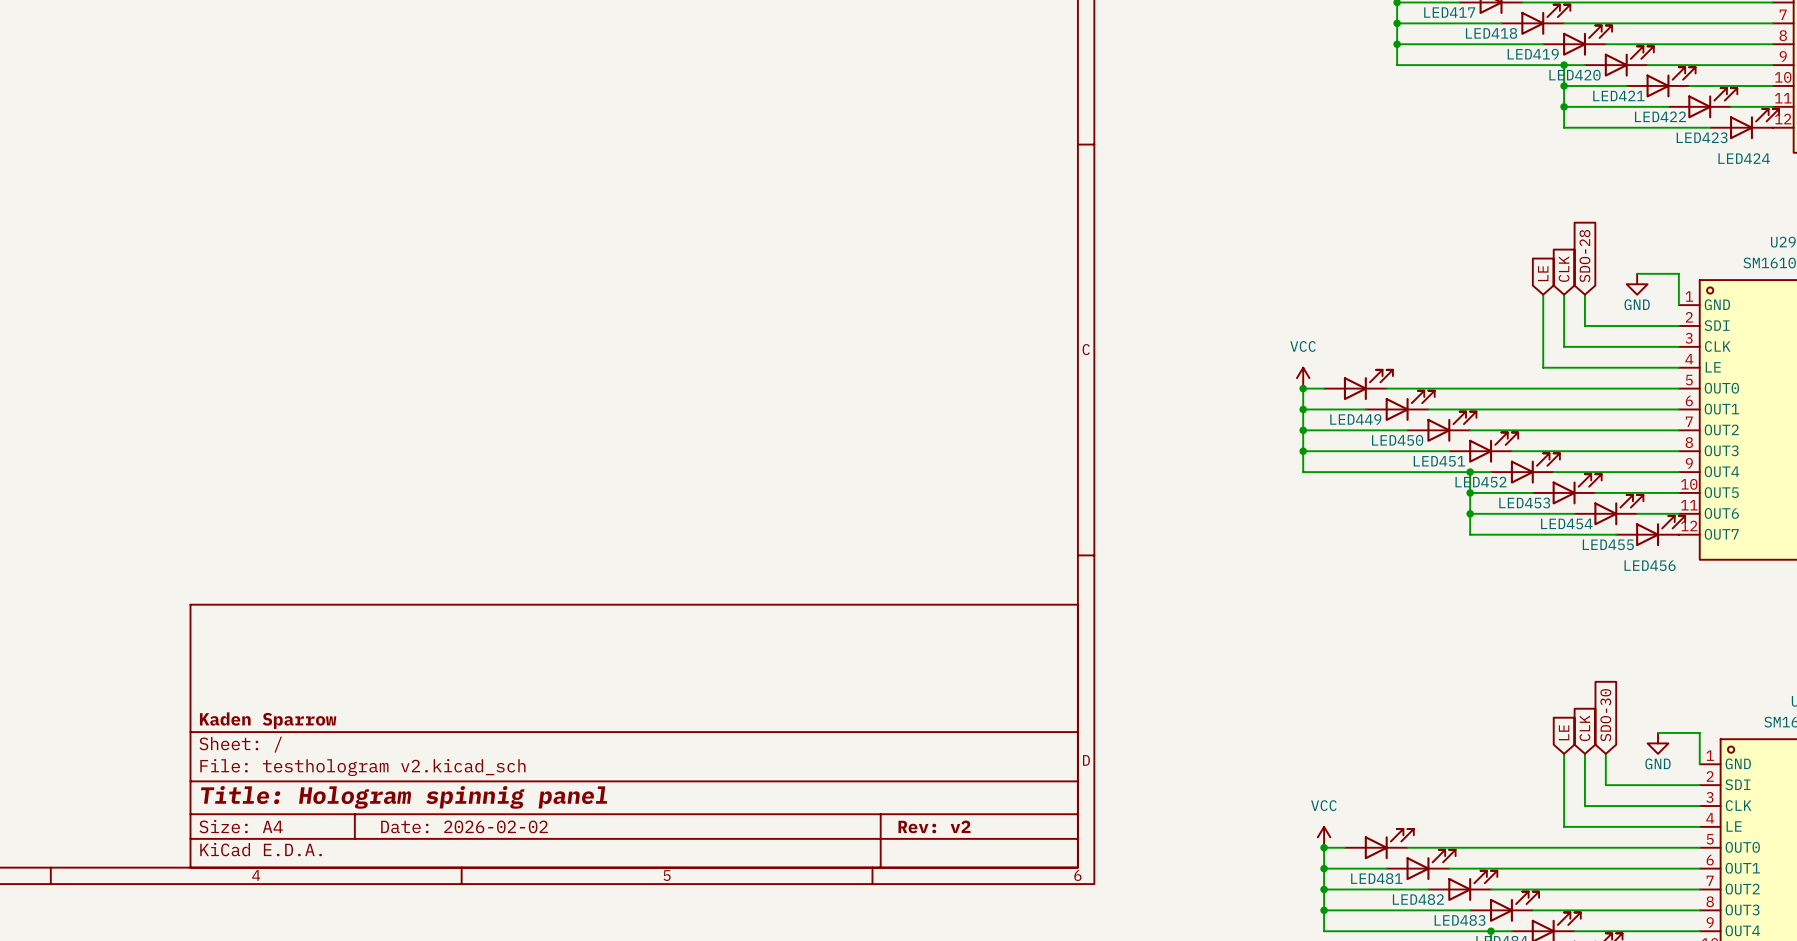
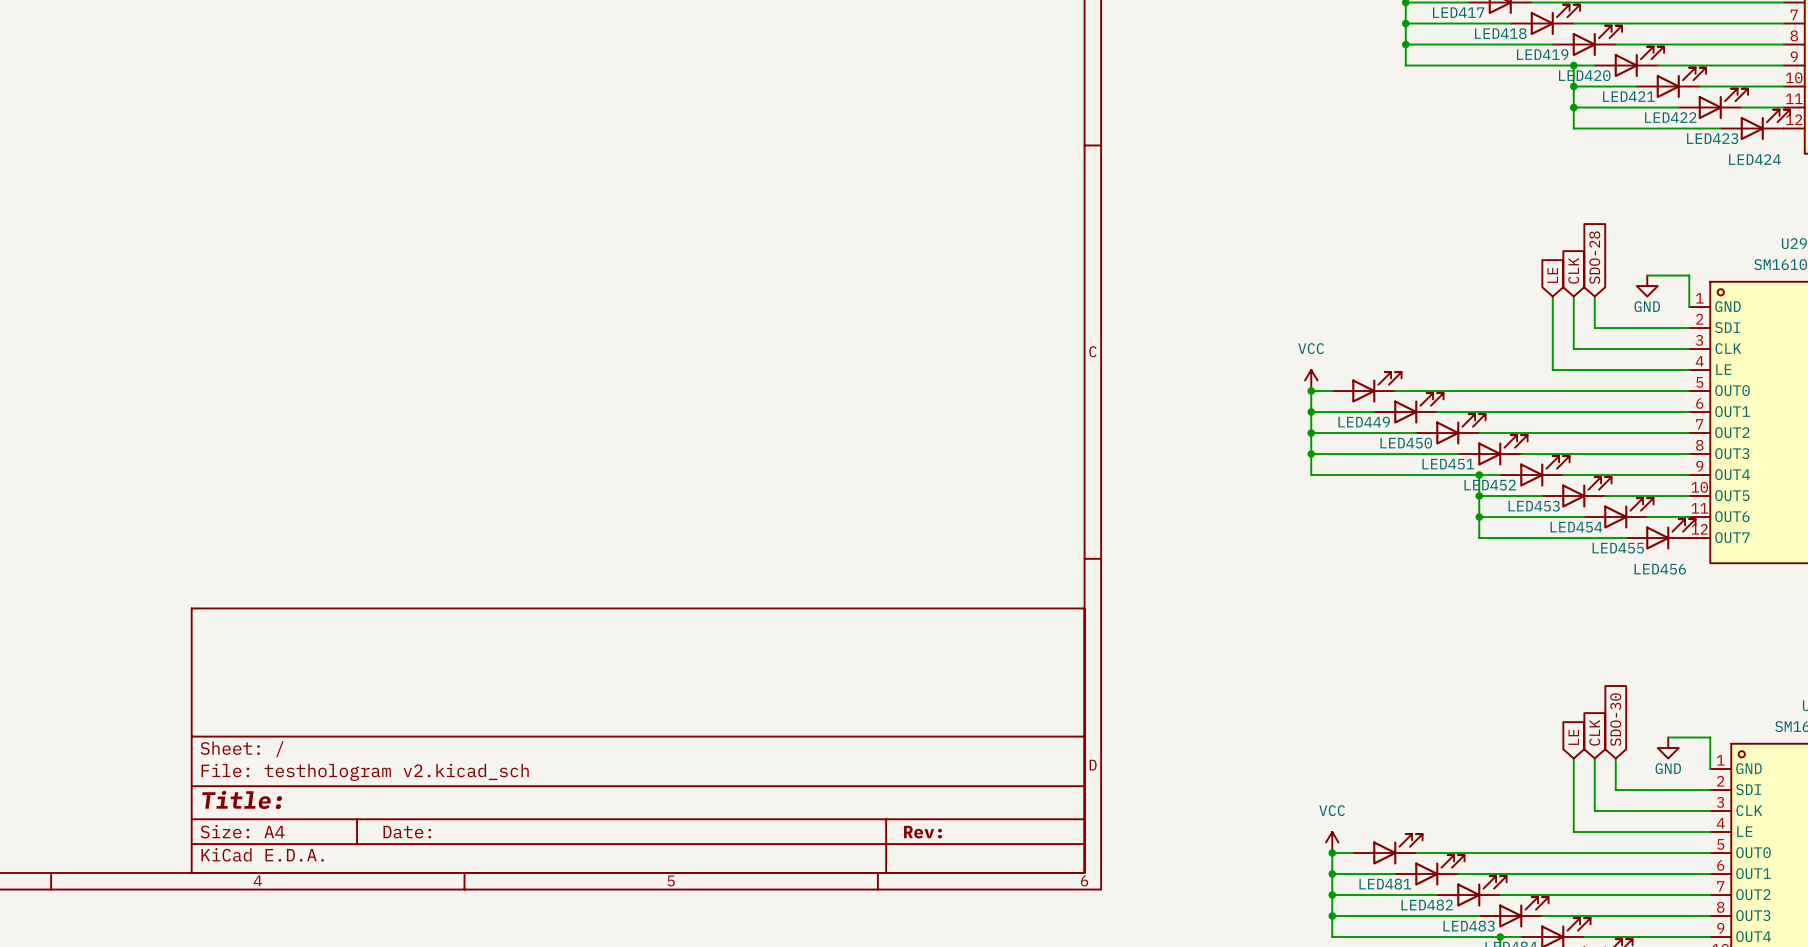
title block: Kaden Sparrow (268, 720) -> none
title block: Title: Hologram spinnig panel (404, 797) -> Title: (242, 799)
title block: Date: 2026-02-02 (464, 826) -> Date: (407, 832)
title block: Rev: v2 (934, 826) -> Rev: (922, 832)

